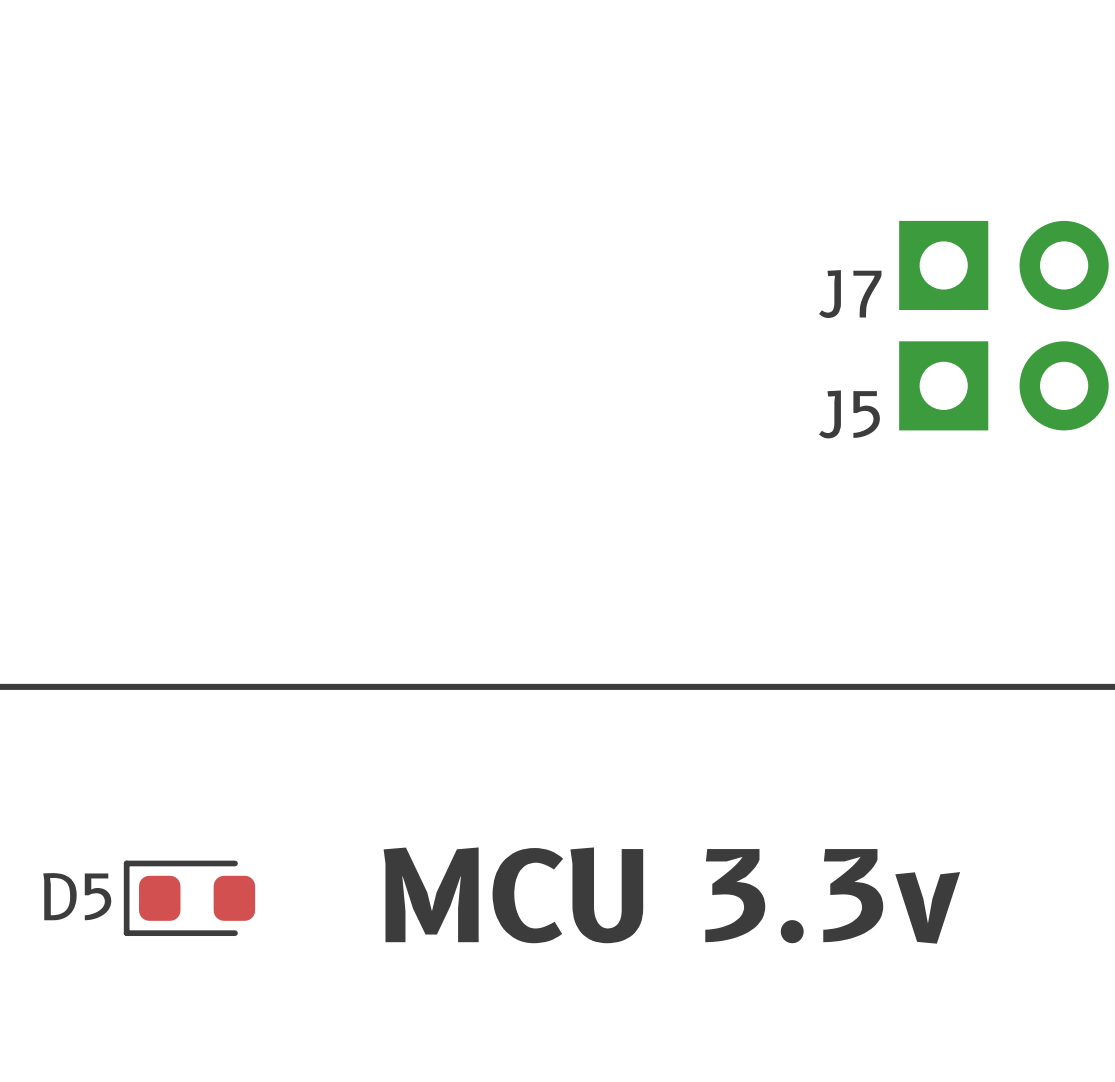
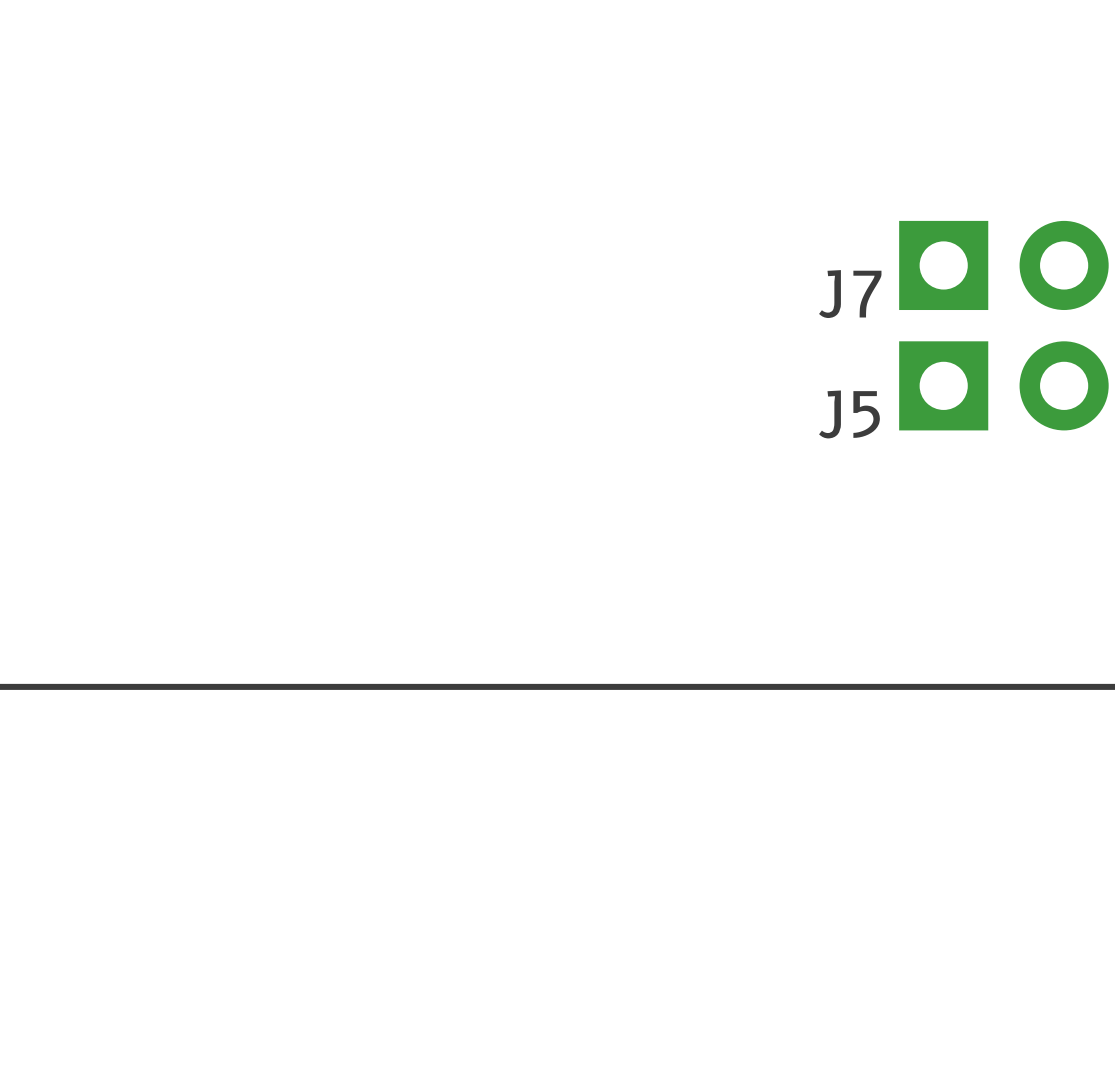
D5: MCU 3.3v (189, 898) -> none

